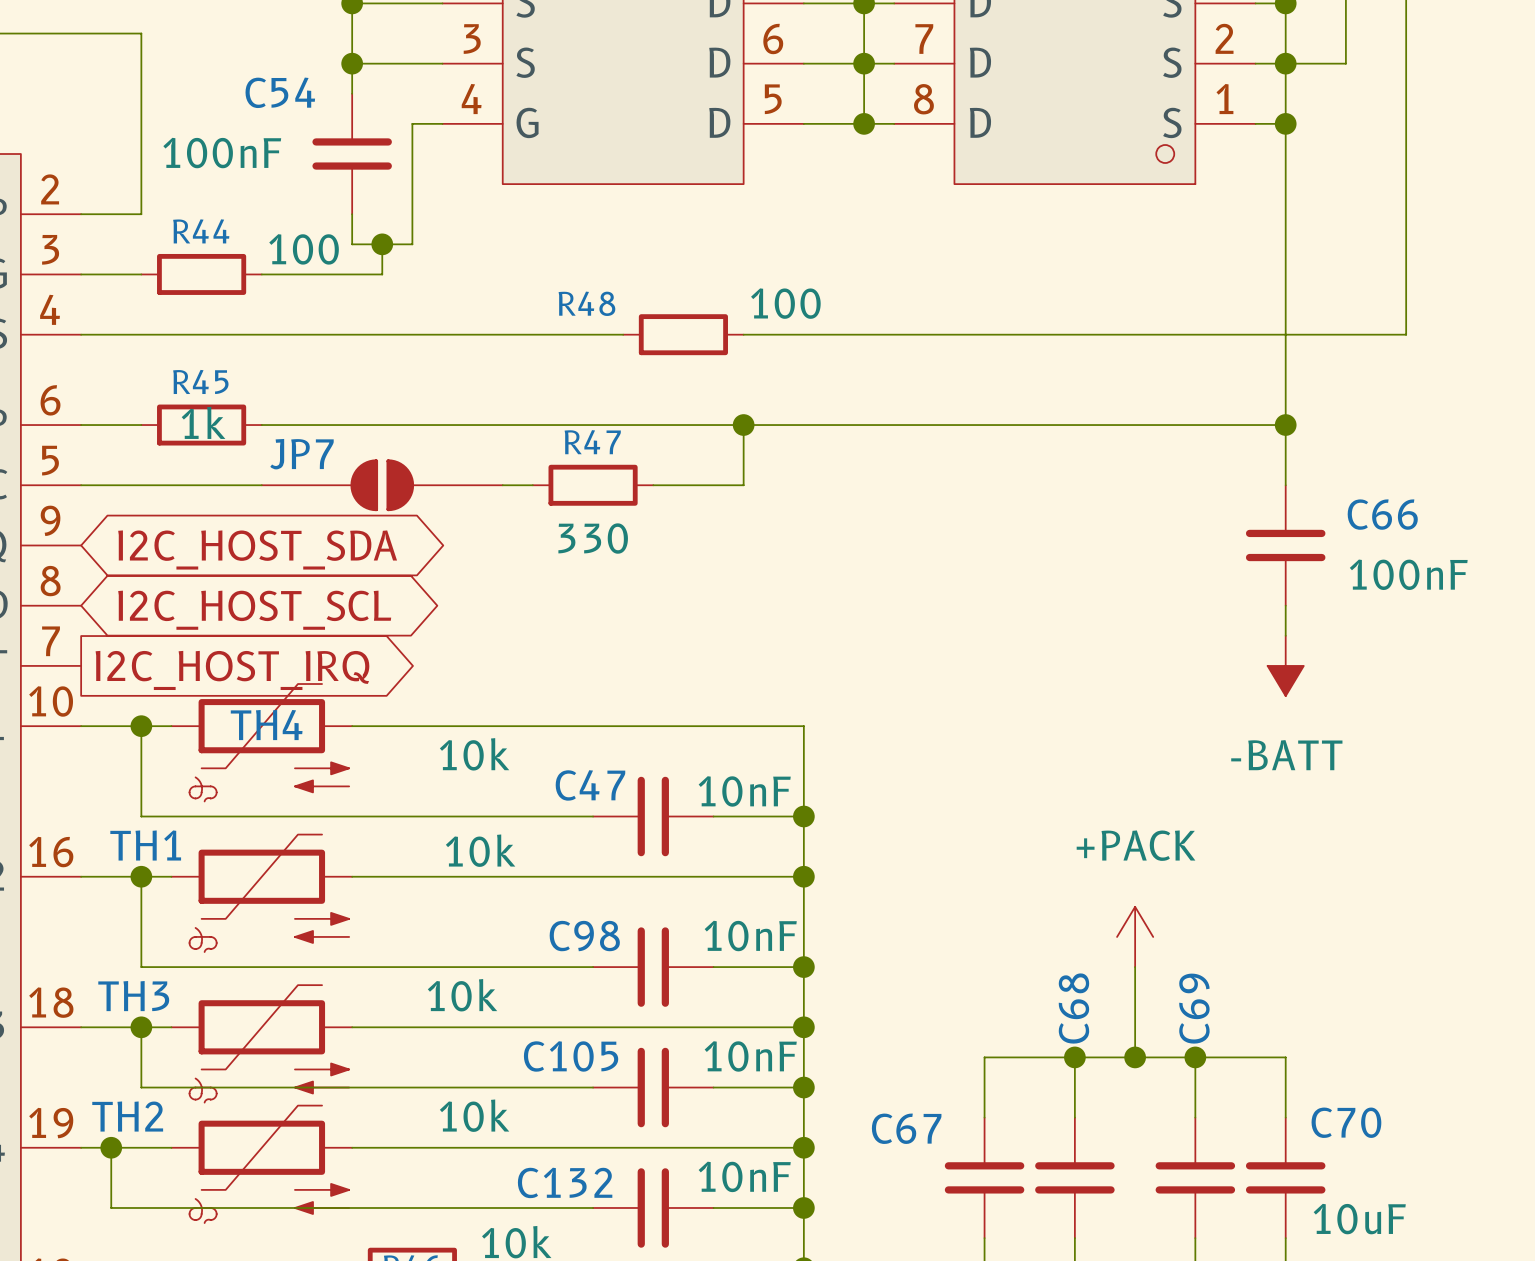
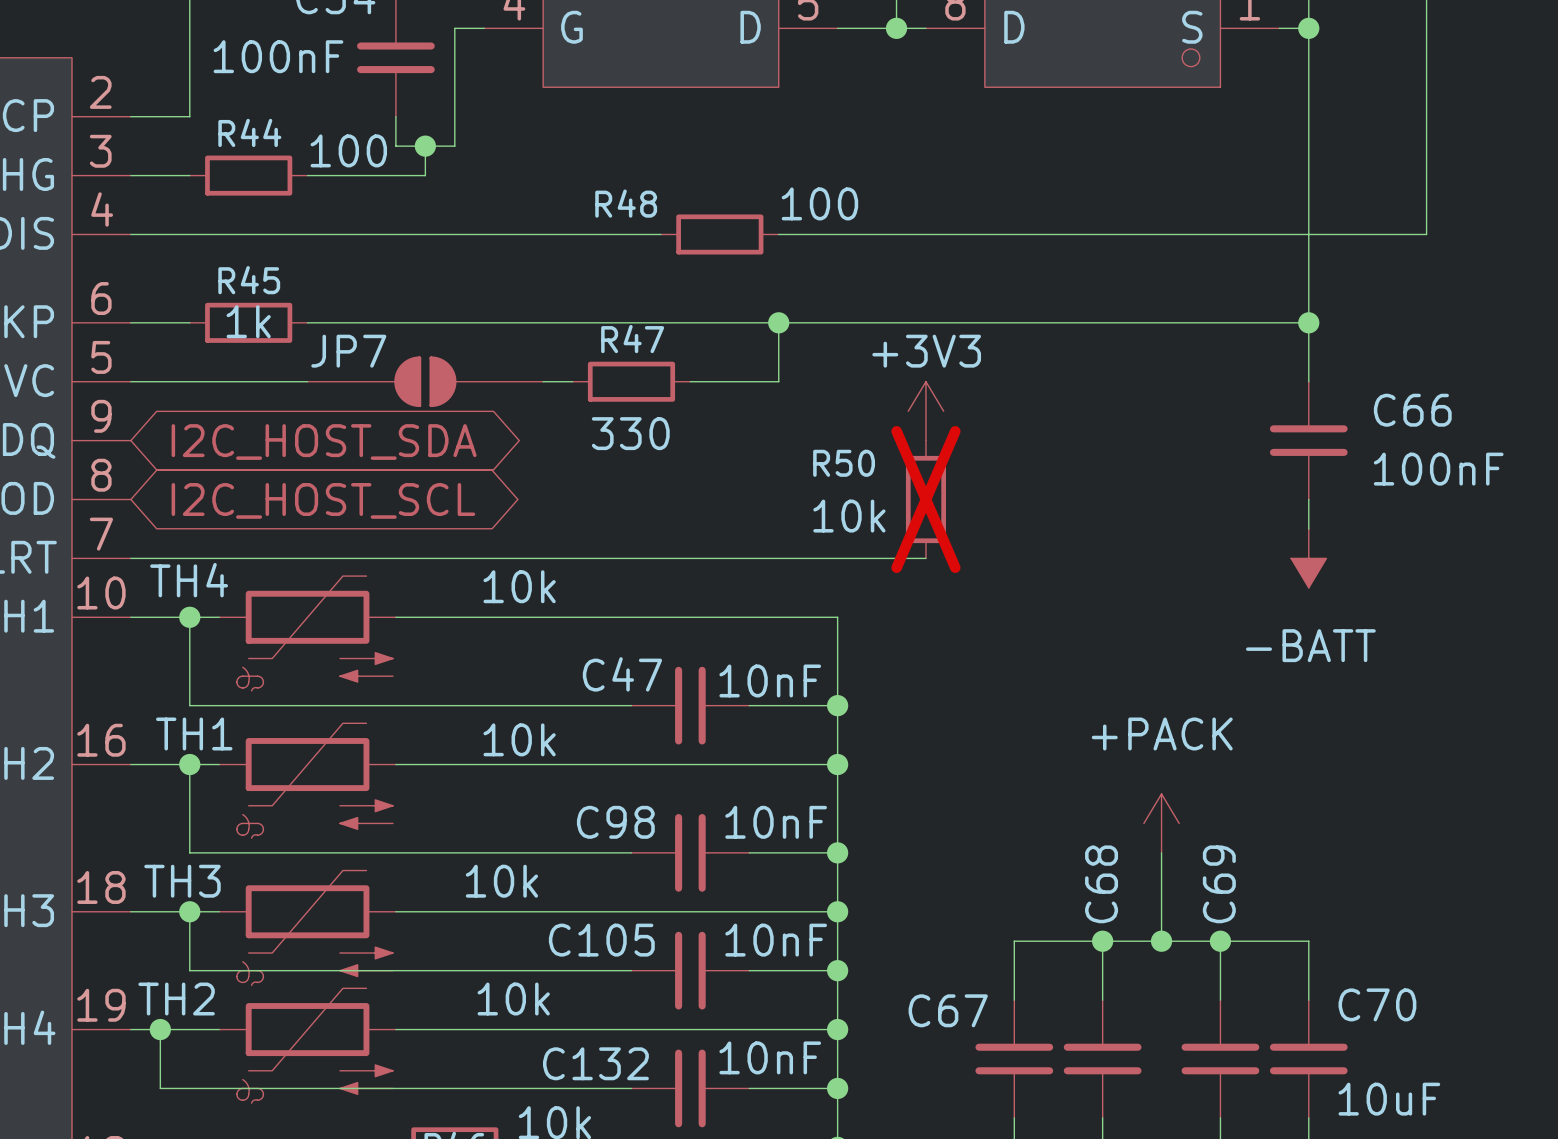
power symbol: none -> +3V3 (925, 411)
R50: none -> 10k (925, 499)
wire: none -> (130, 558) (925, 558)
global label: I2C_HOST_IRQ (232, 670) -> none
TH4 name position: TH4 (266, 725) -> TH4 (189, 580)
TH4 value position: 10k (474, 754) -> 10k (519, 586)

